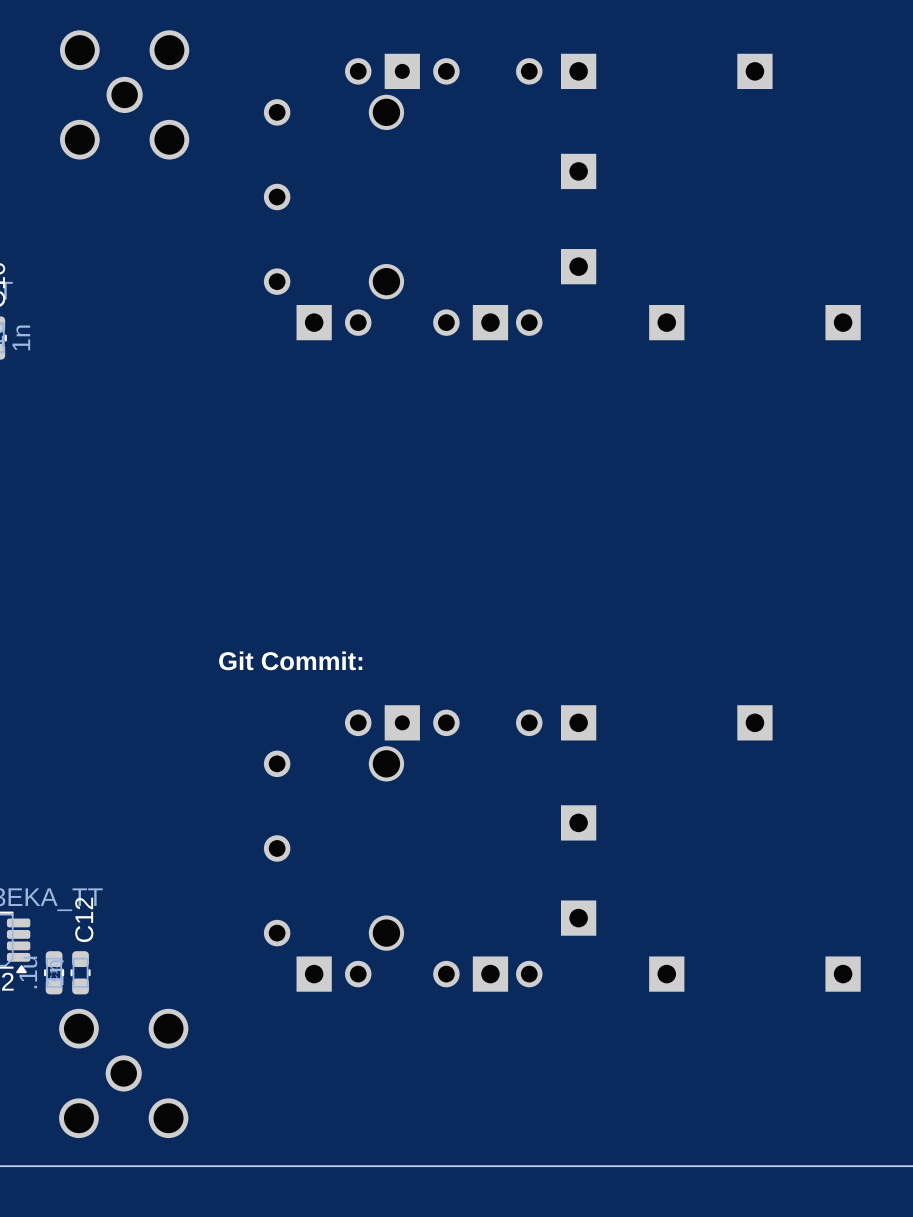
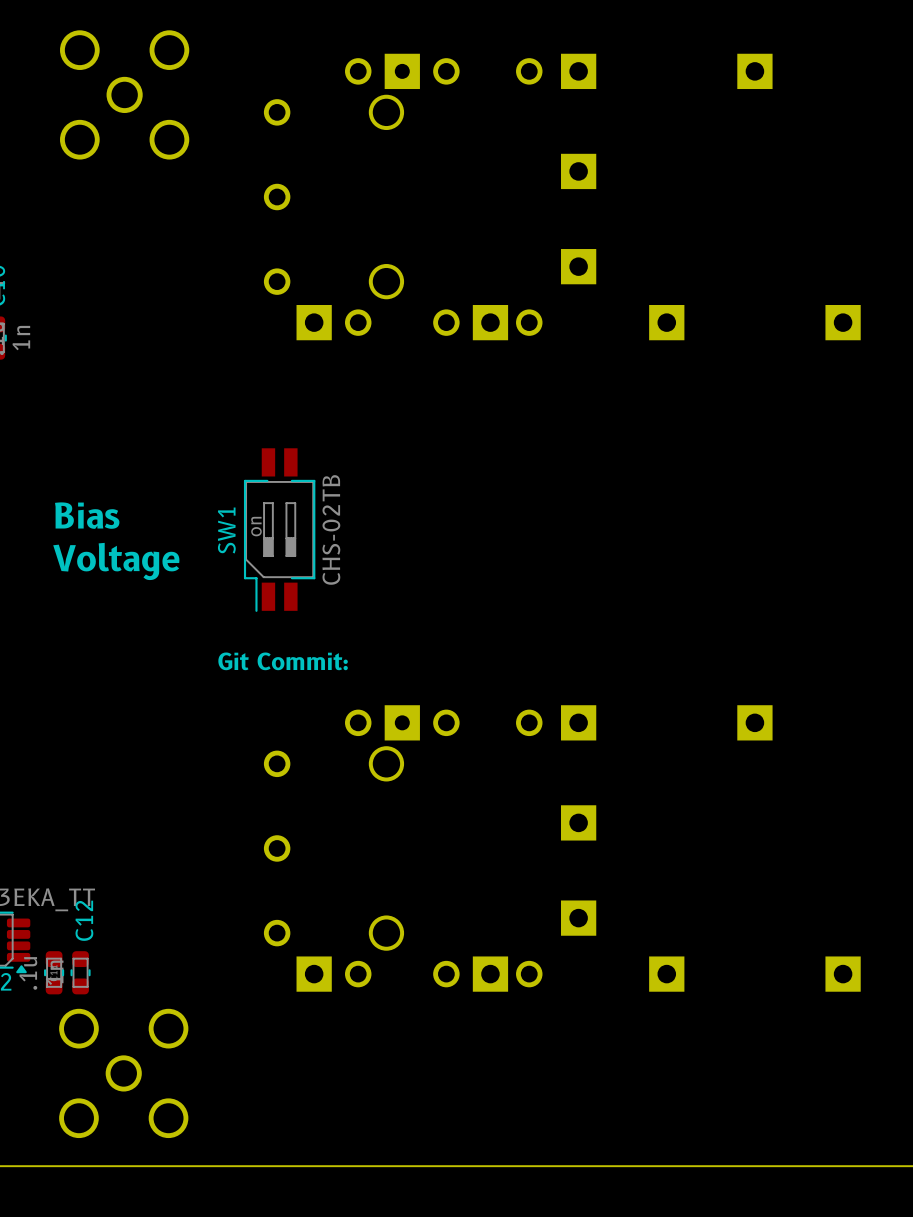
text: none -> Bias (87, 515)
SW1: none -> CHS-02TB (279, 530)
text: none -> Voltage (116, 561)

